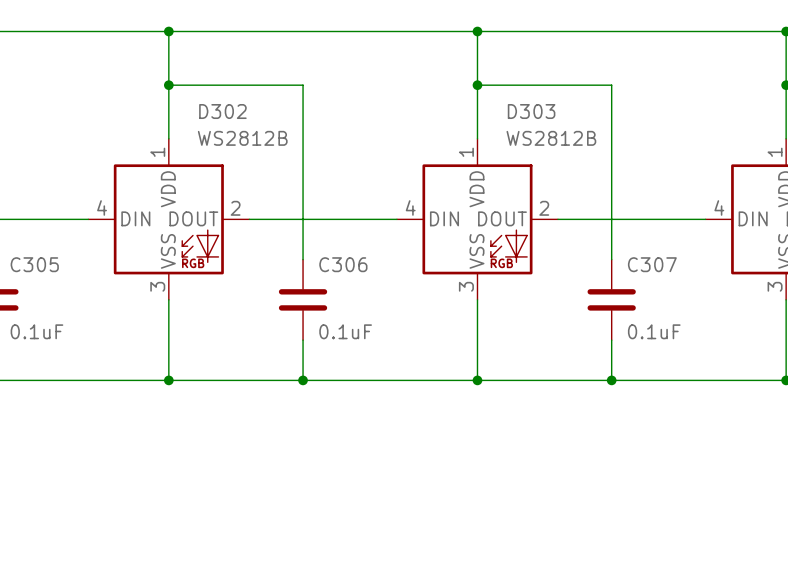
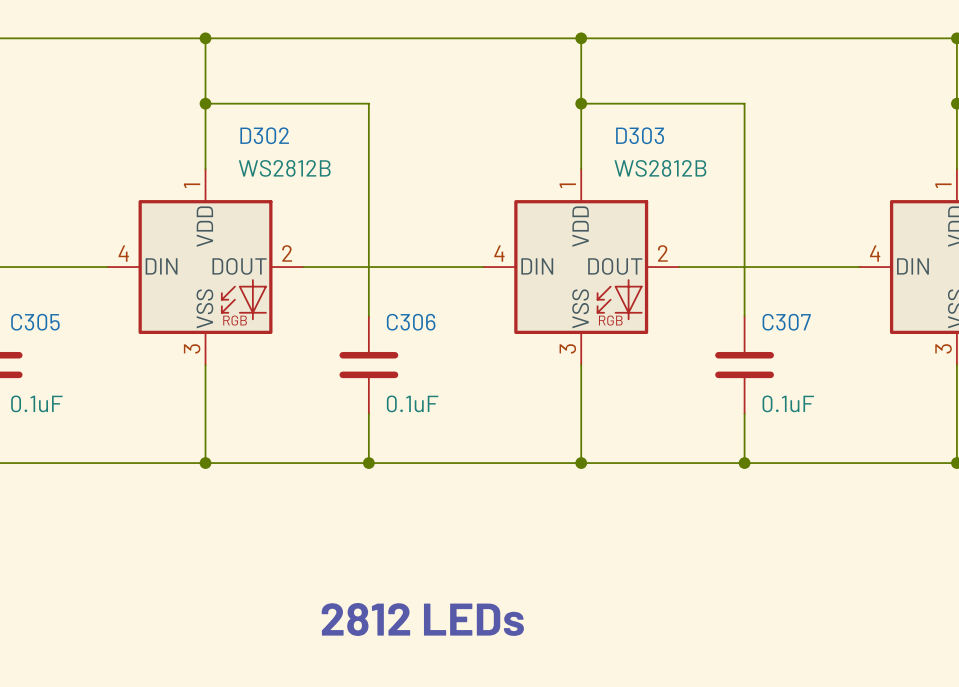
text: none -> 2812 LEDs (422, 619)

